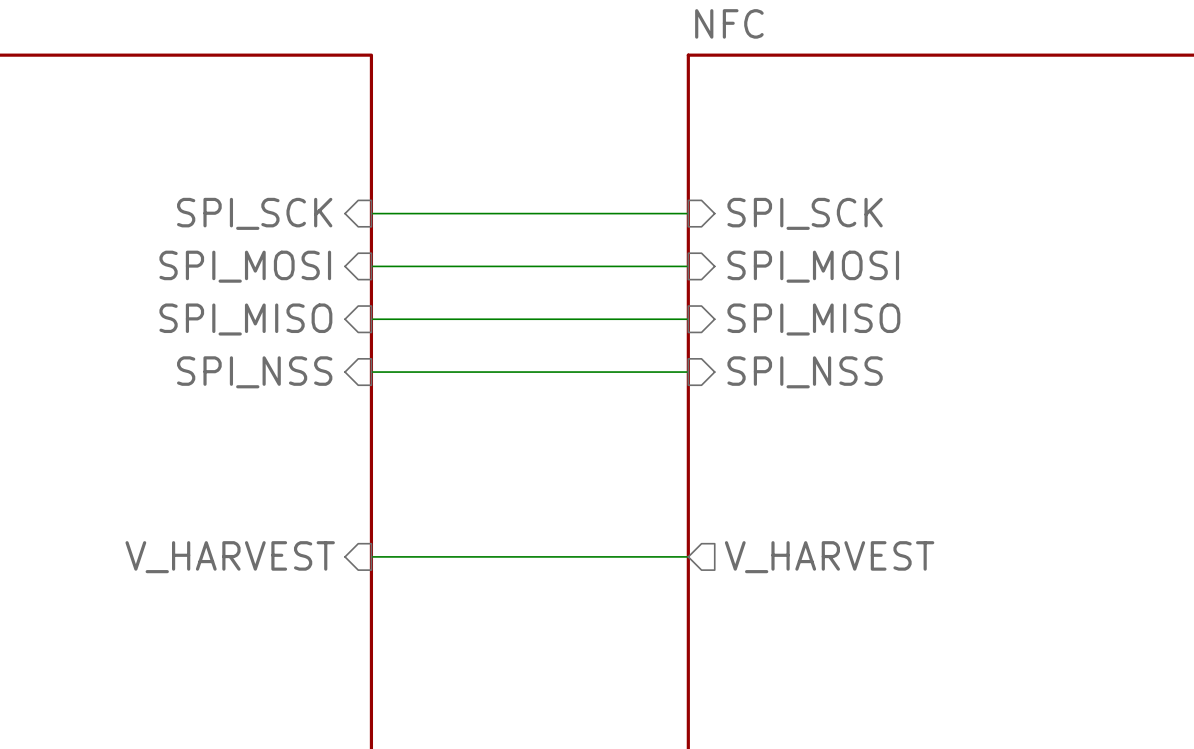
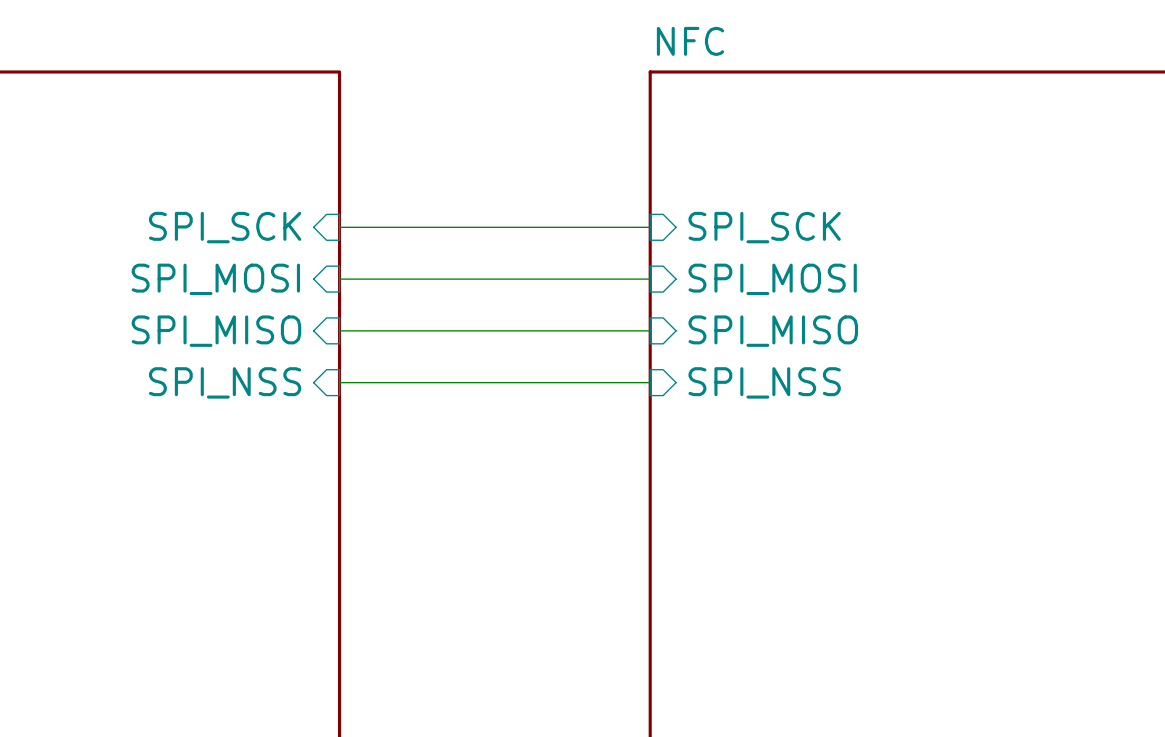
wire: (371, 556) (688, 556) -> none
sheet pin: V_HARVEST (230, 557) -> none
sheet pin: V_HARVEST (829, 557) -> none

